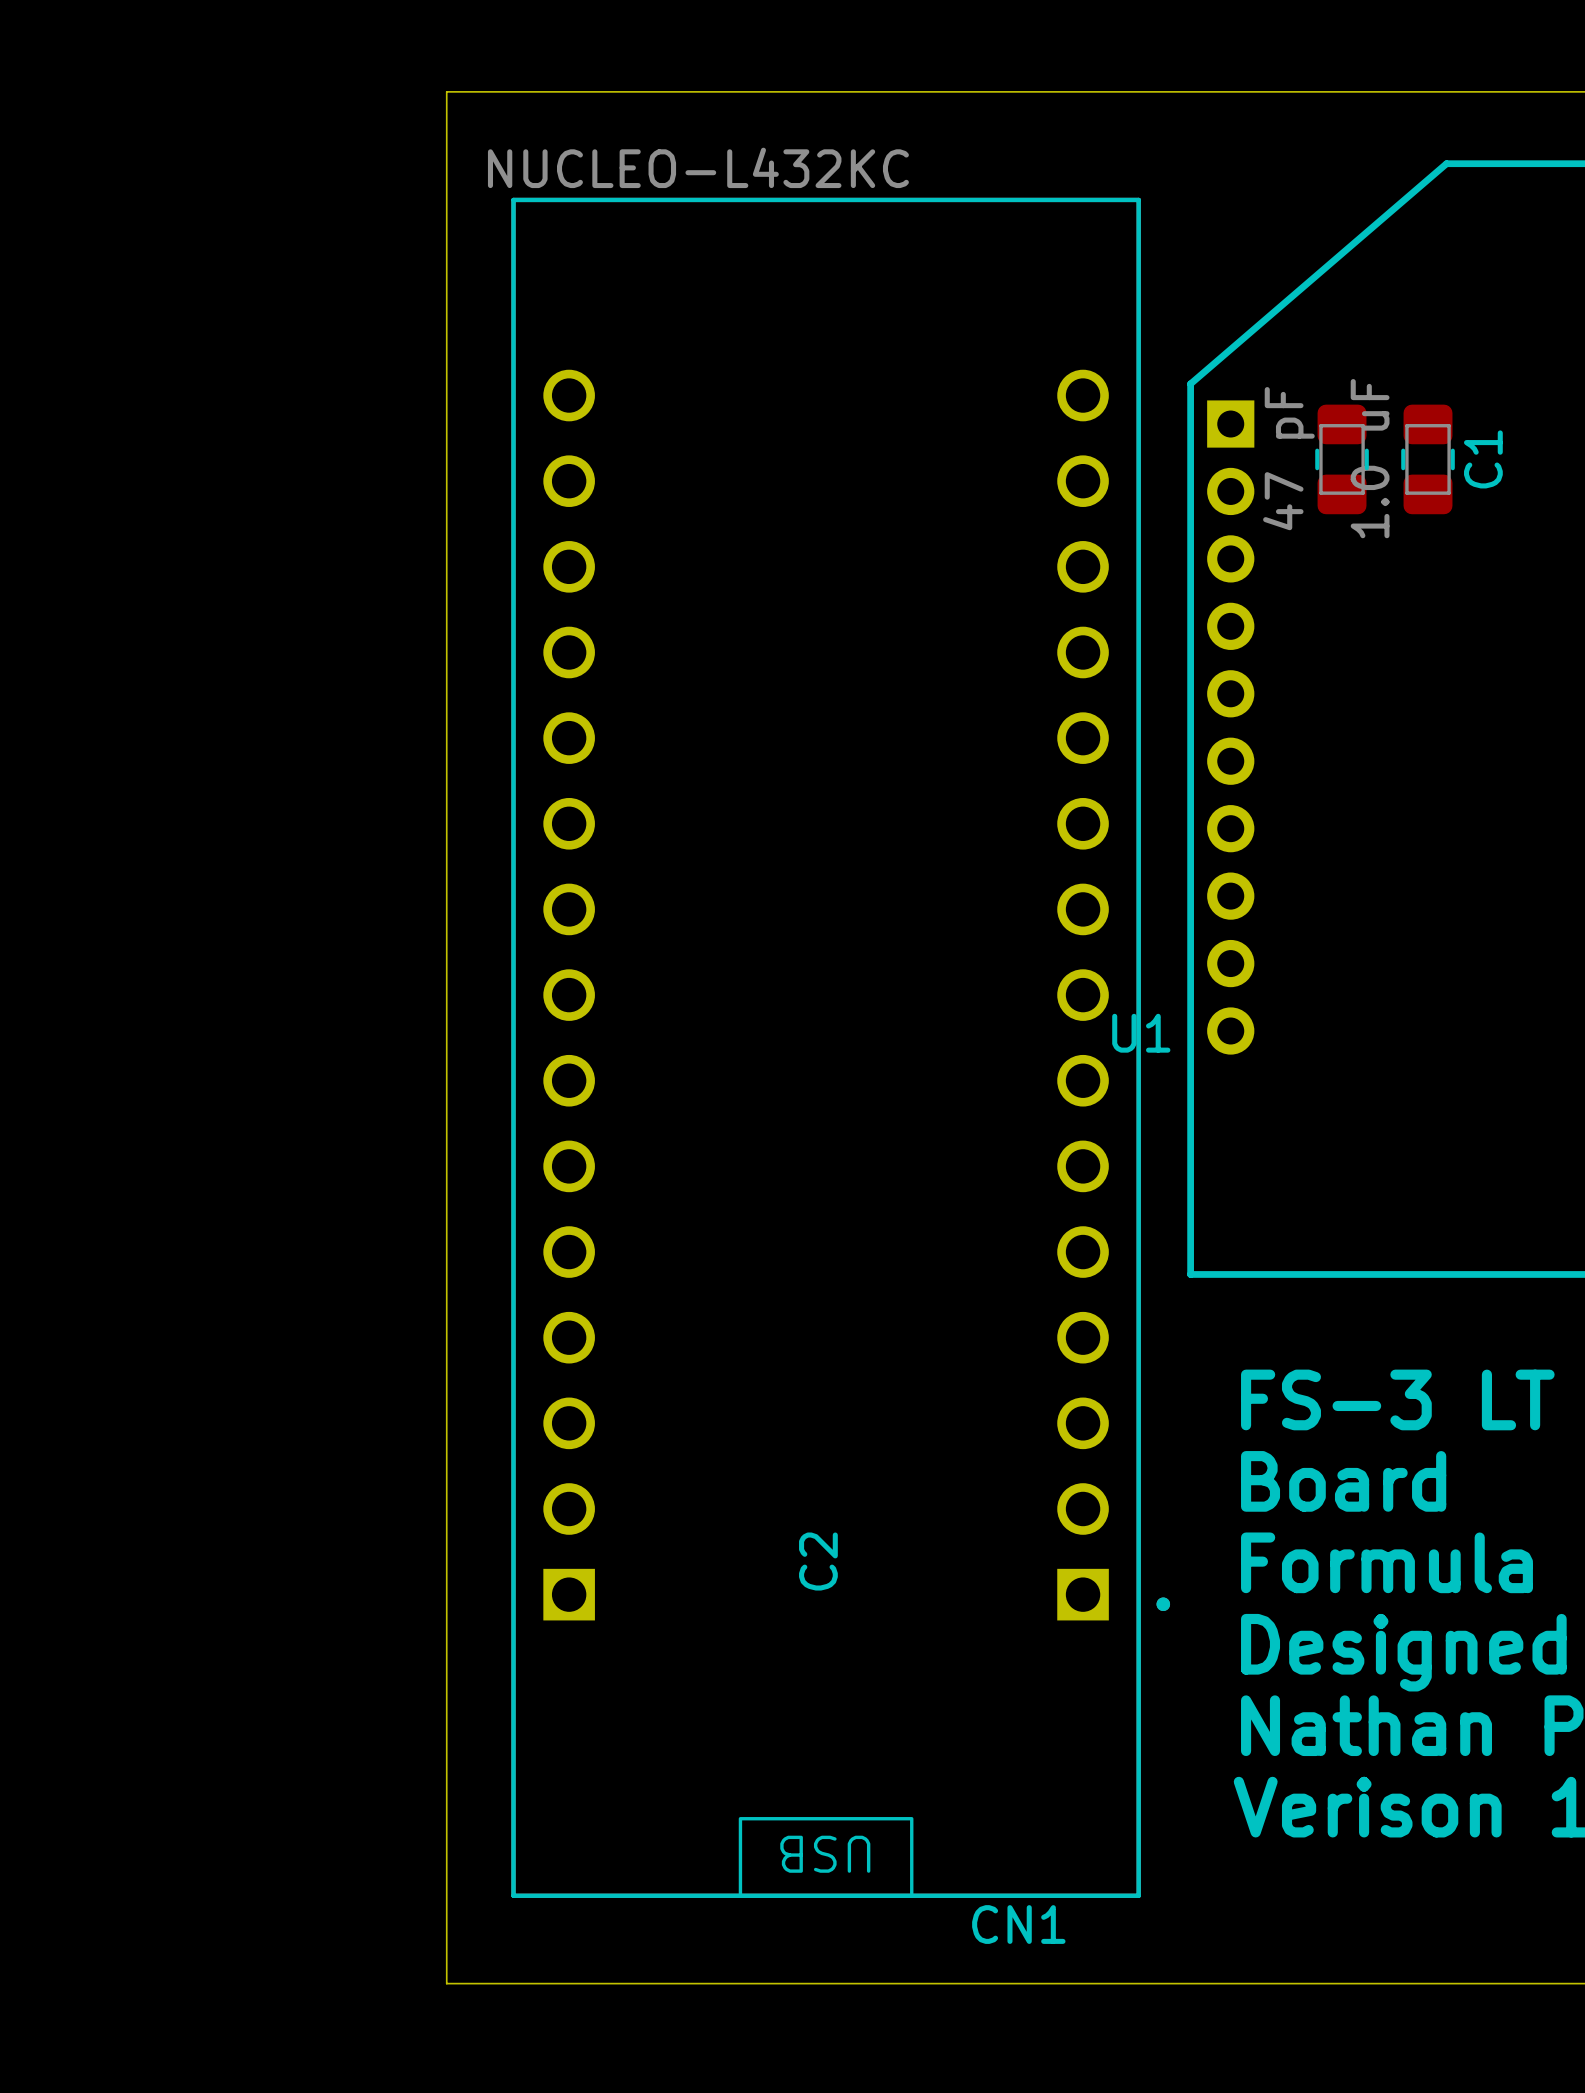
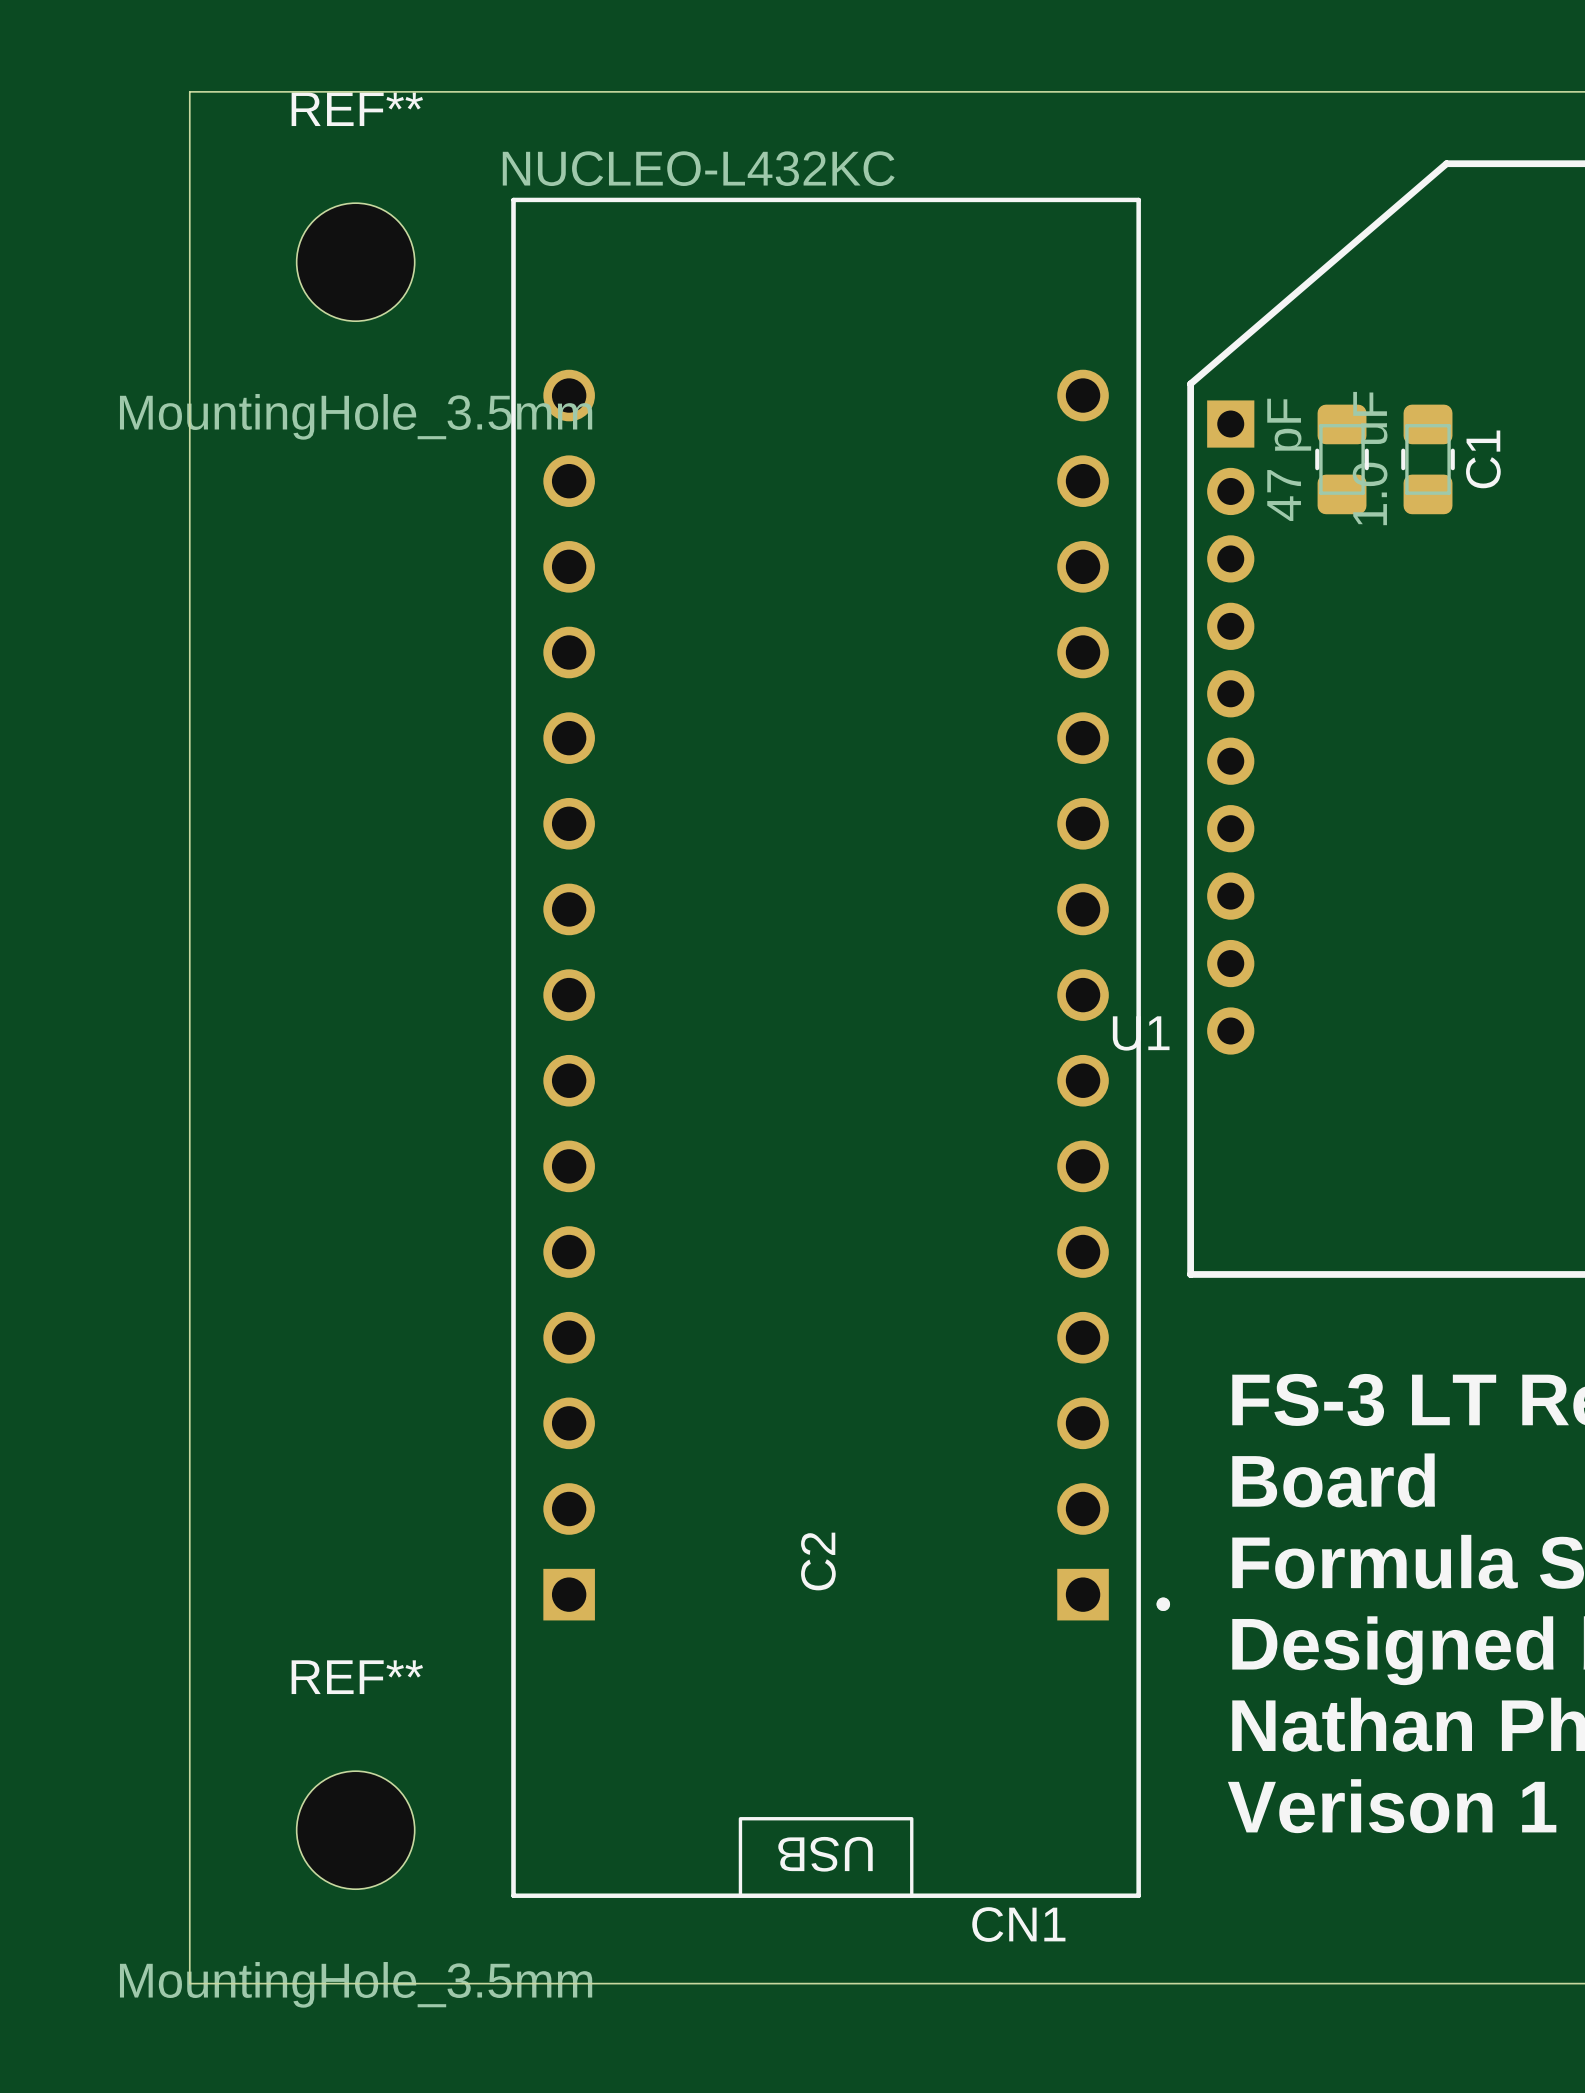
board edge: (446, 91) (446, 1983) -> (446, 91) (189, 91) (189, 1983) (446, 1983)
REF**: none -> MountingHole_3.5mm (355, 262)
REF**: none -> MountingHole_3.5mm (355, 1830)

